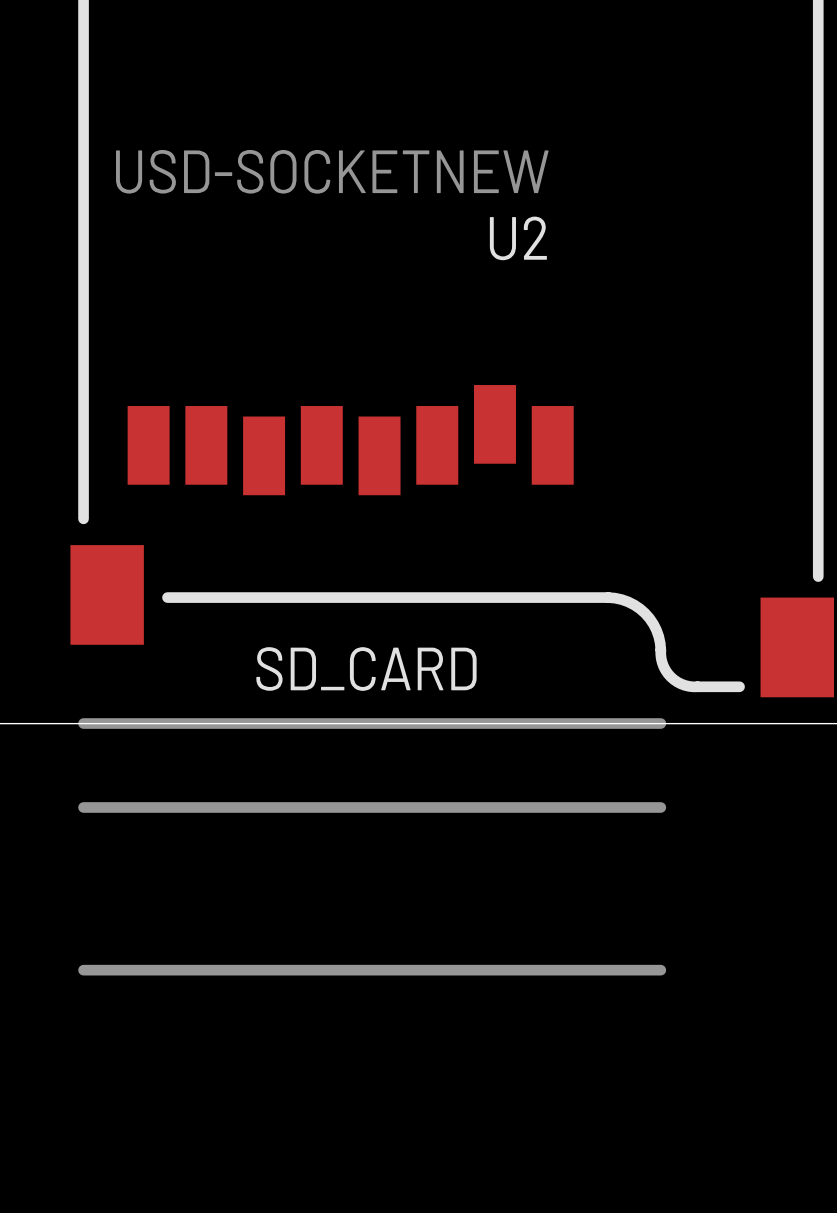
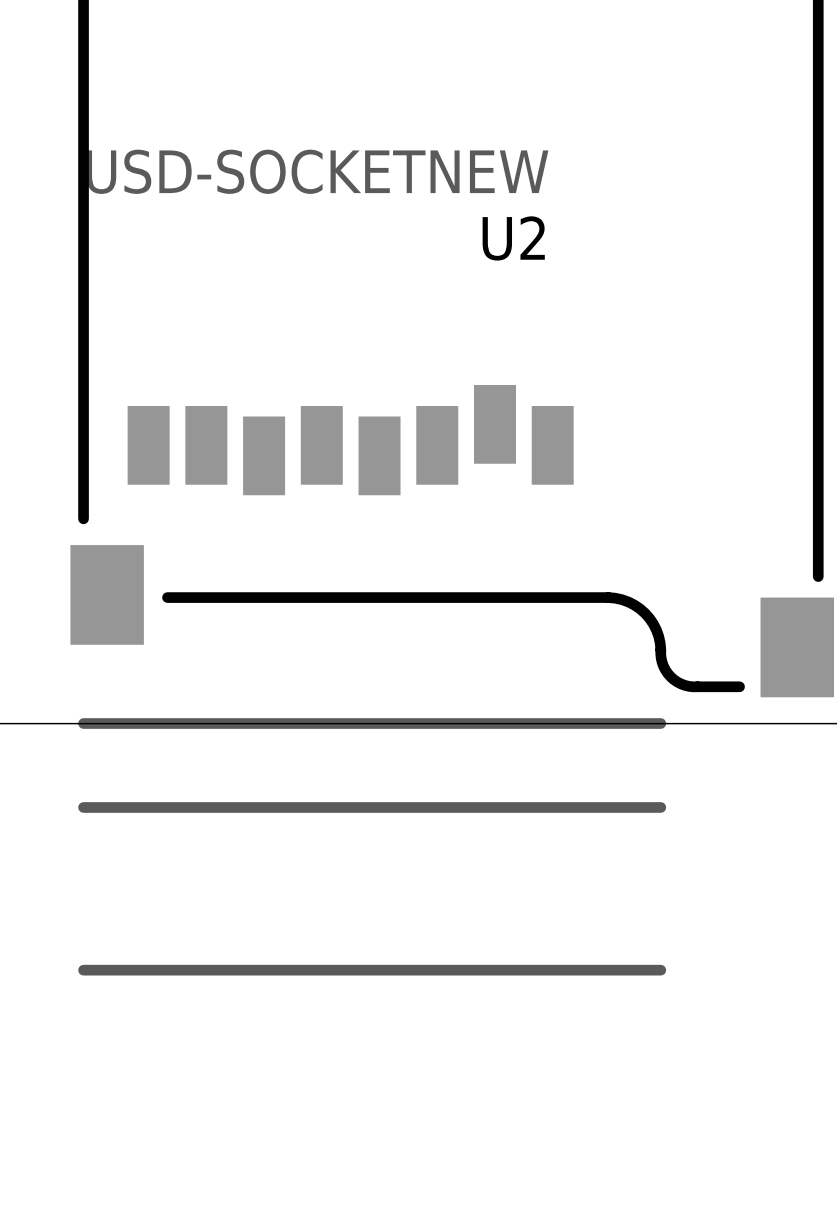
text: SD_CARD (366, 669) -> none

